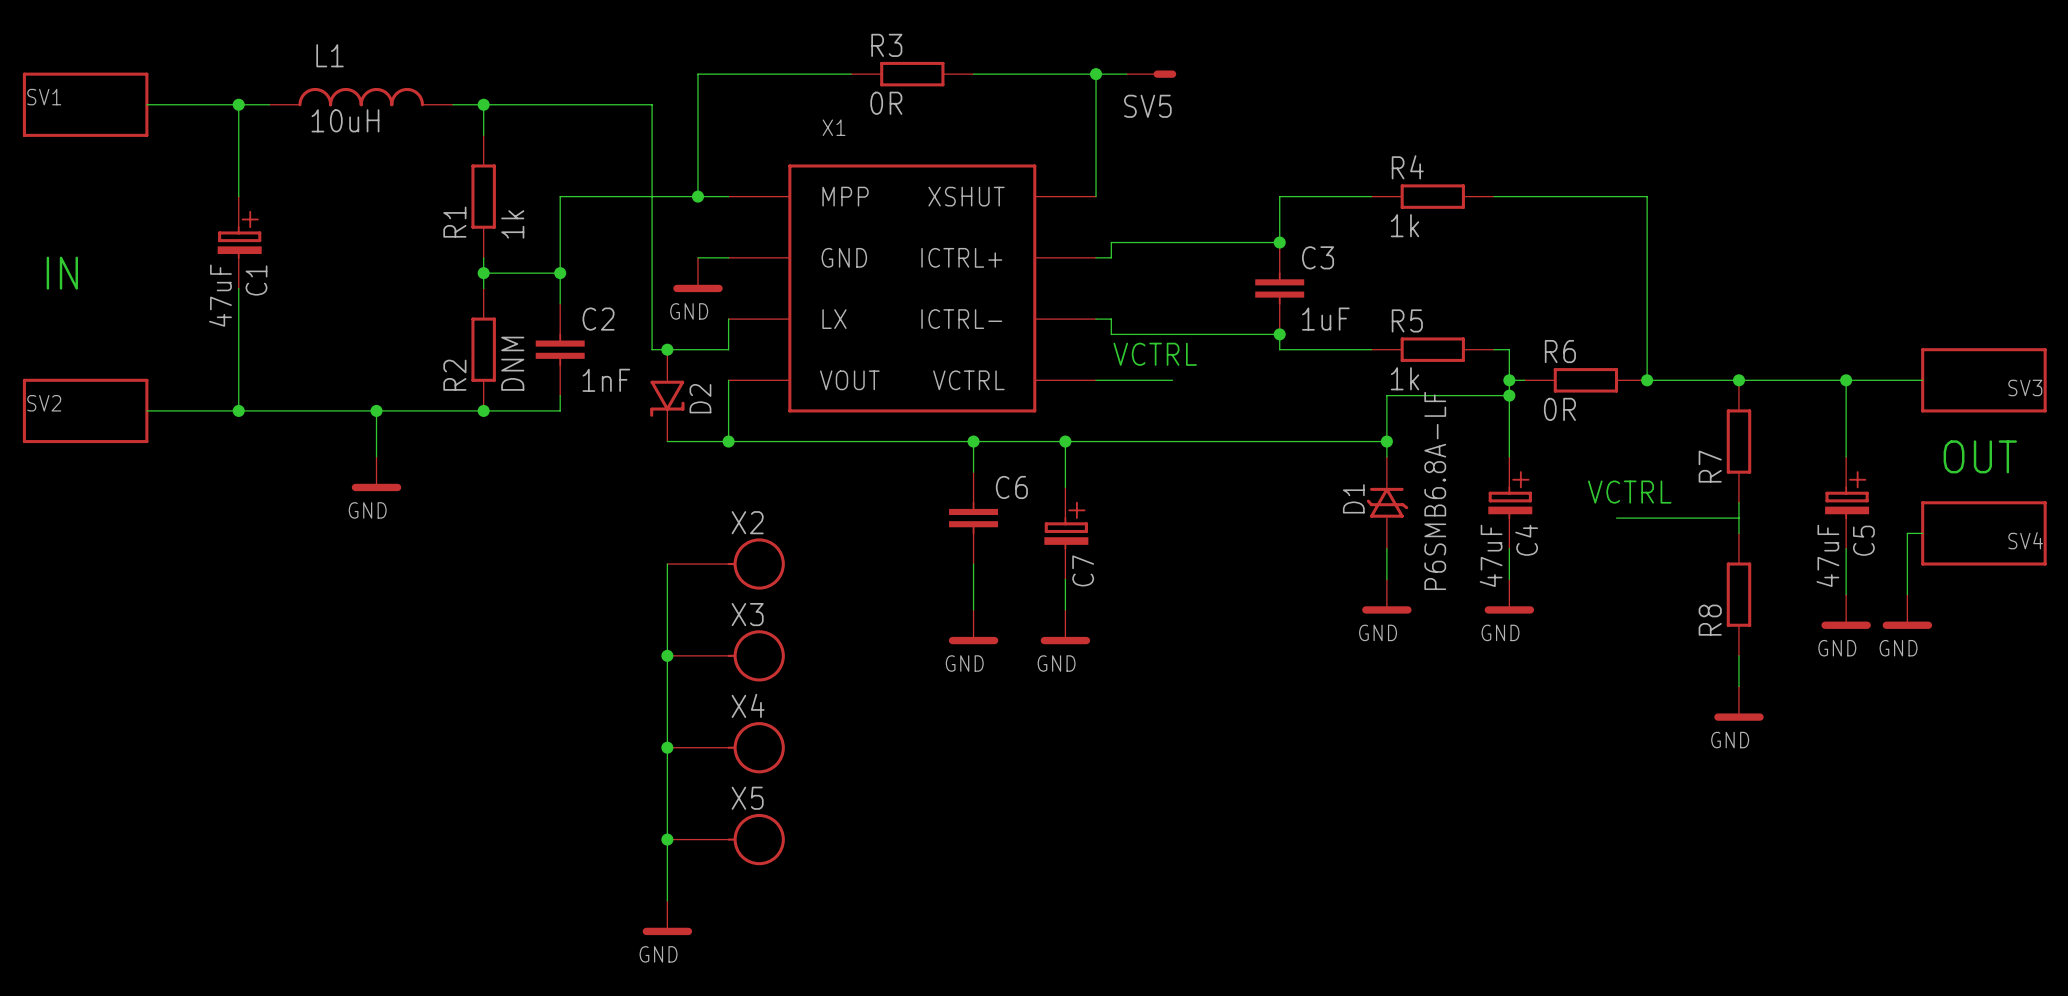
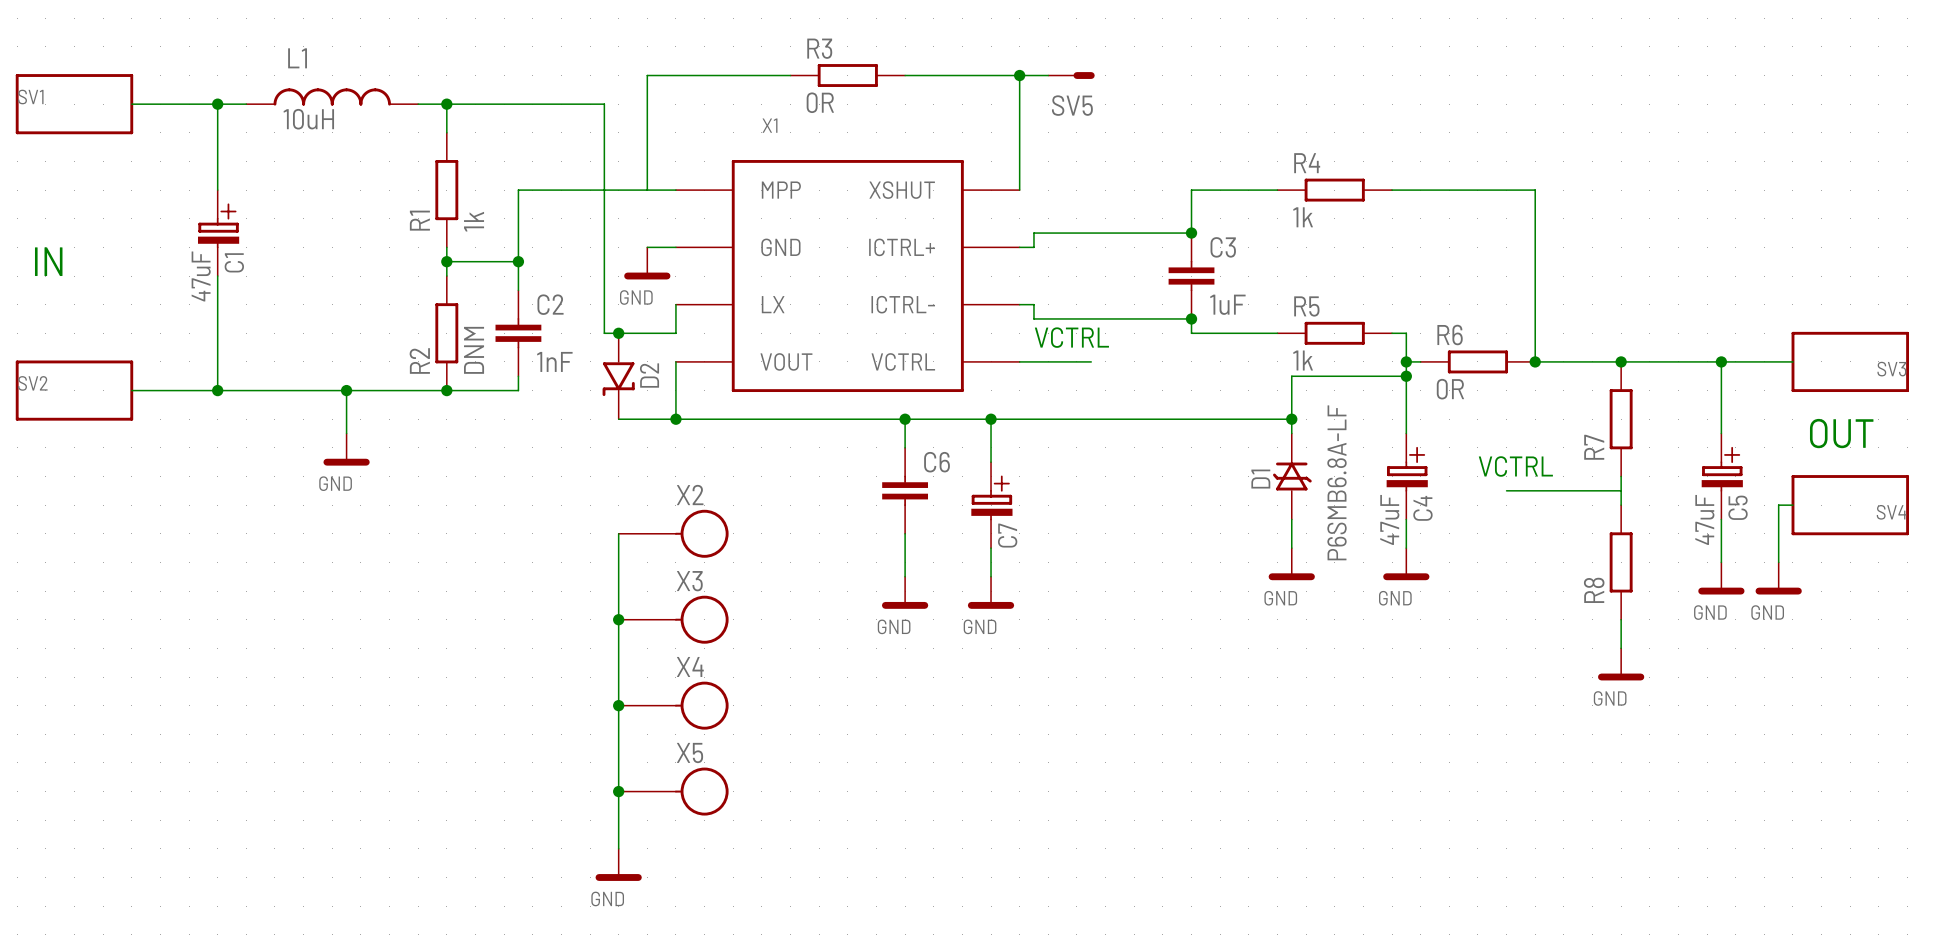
junction: (697, 196) -> none

